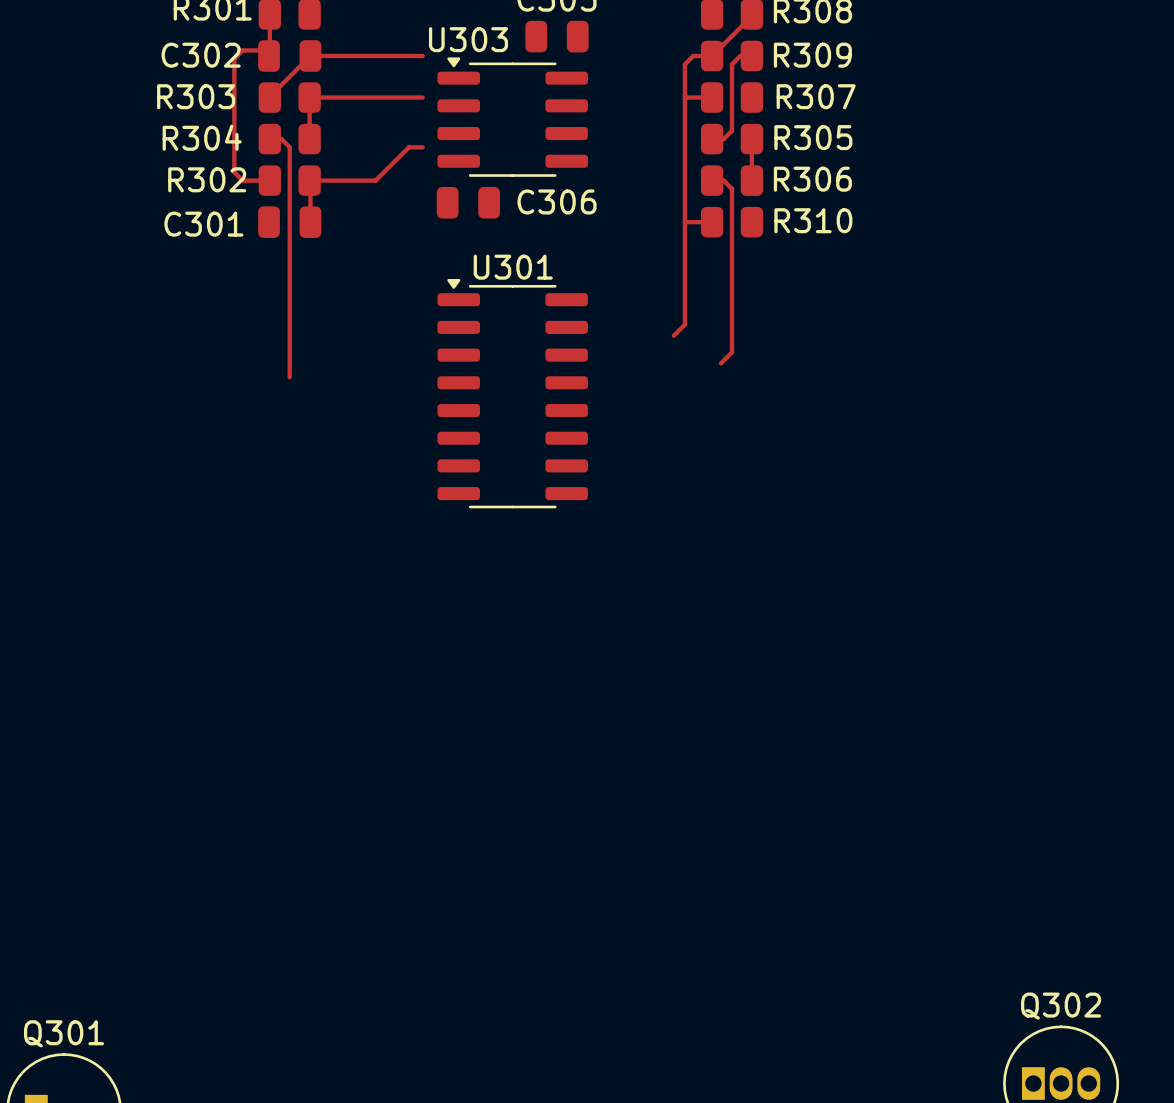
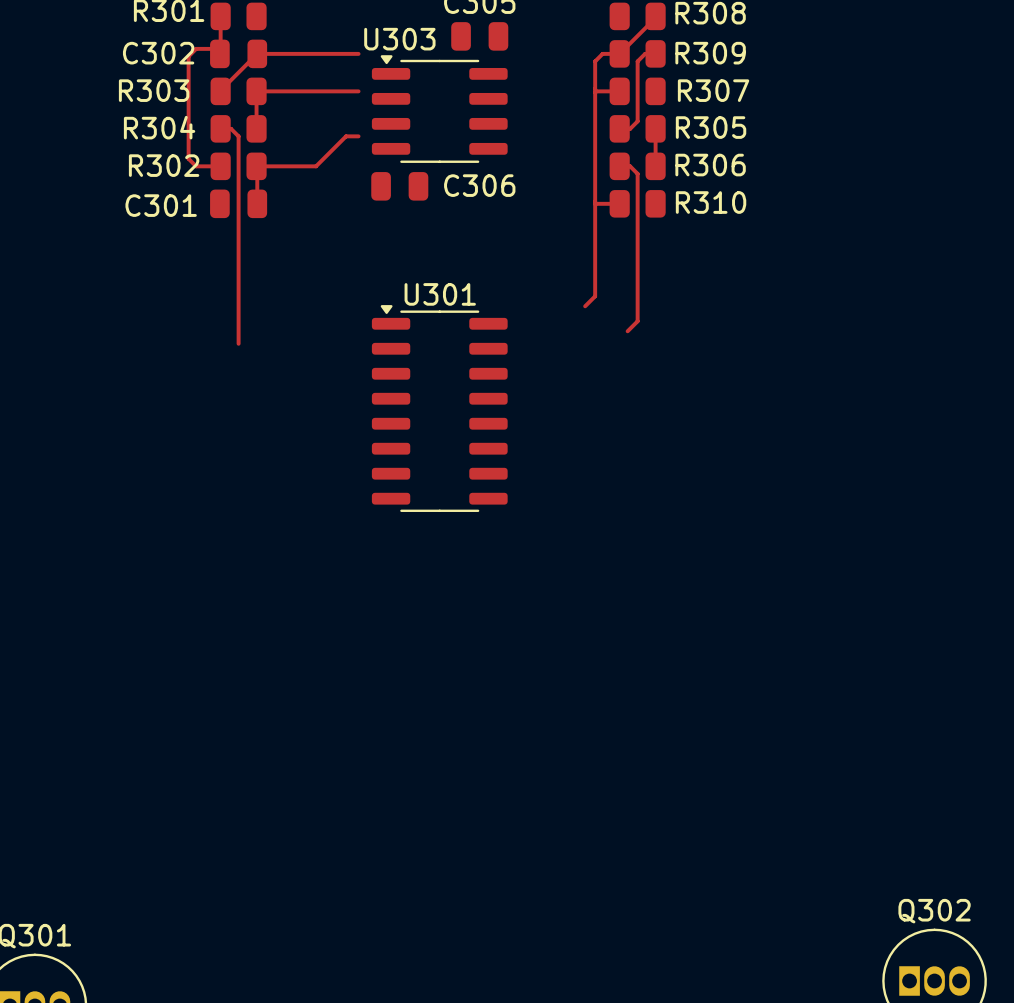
U301 position: (512, 393) -> (439, 408)

